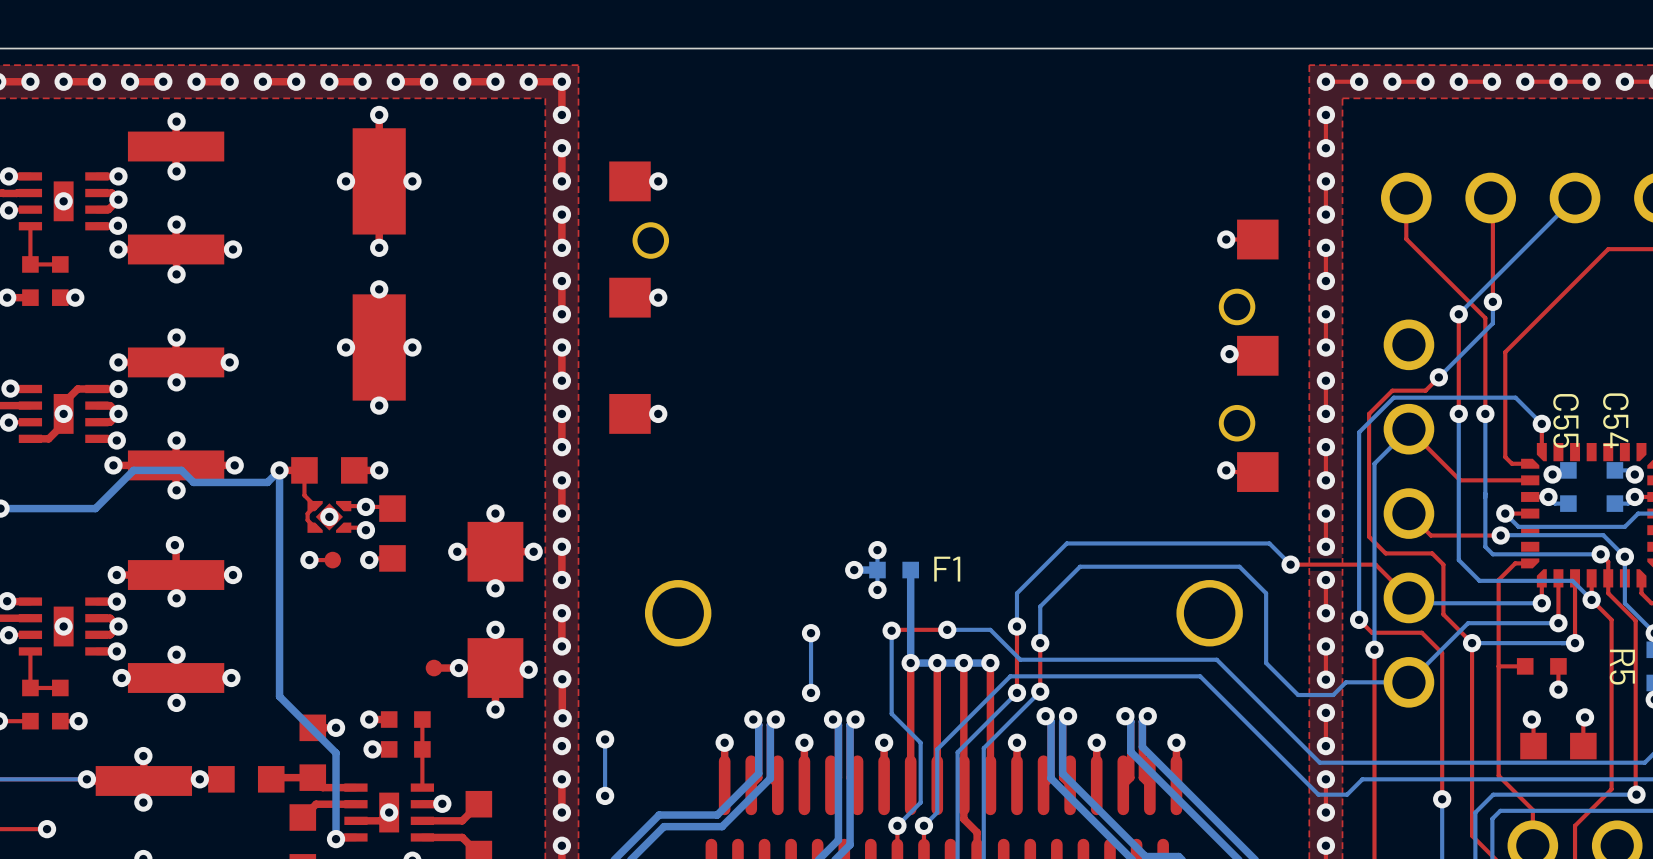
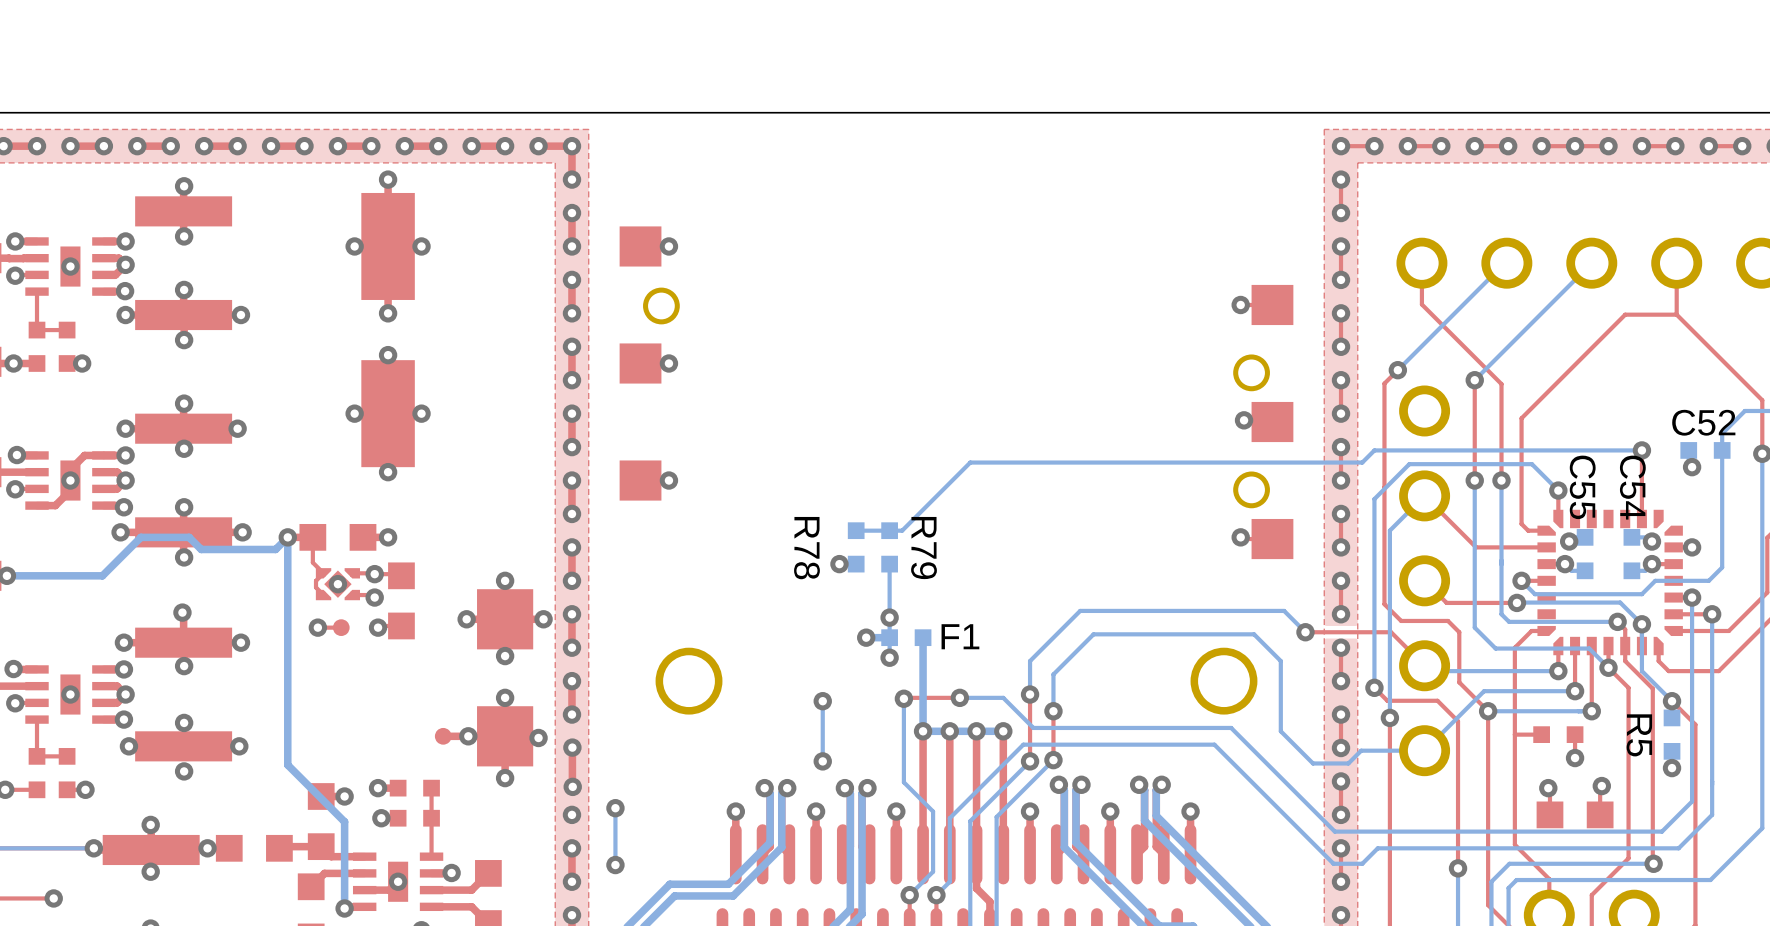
top track: (1490, 198) (1492, 200) (1492, 301) -> none
bottom track: none -> (1506, 263) (1397, 370)
bottom track: (1492, 301) (1492, 323) (1438, 377) -> none
via: (1492, 301) -> none
via: none -> (1397, 370)
top track: (1438, 377) (1425, 390) (1392, 390) (1369, 413) -> (1397, 370) (1384, 383) (1384, 480)
via: (1438, 377) -> none
top track: none -> (1641, 450) (1641, 518)
bottom track: none -> (1641, 450) (1374, 450) (1362, 462) (970, 462) (902, 530) (856, 530)
via: none -> (1641, 450)
R78: none -> (856, 547)
R79: none -> (889, 547)
via: none -> (839, 564)
bottom track: none -> (889, 564) (889, 617)

